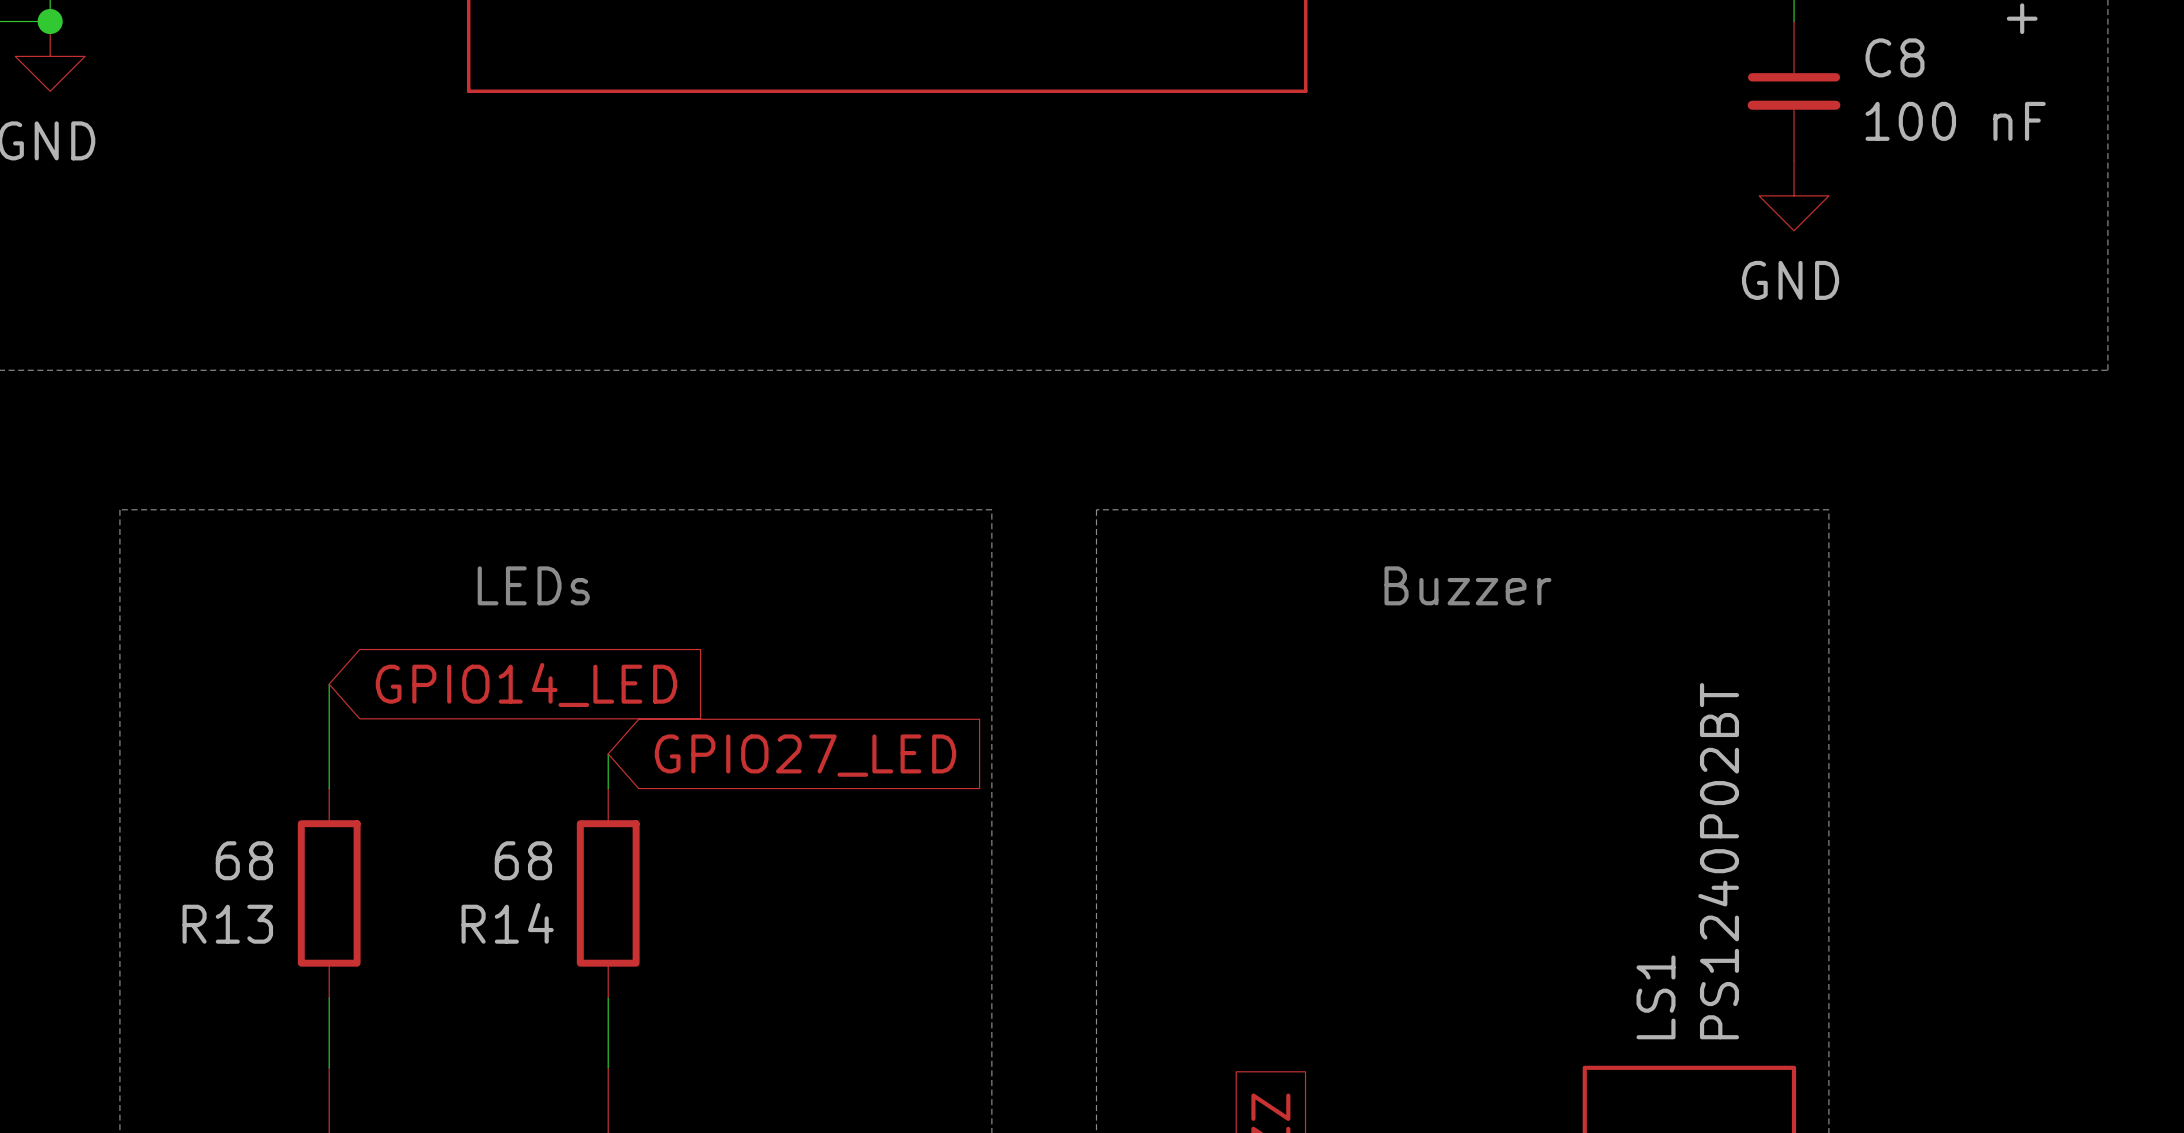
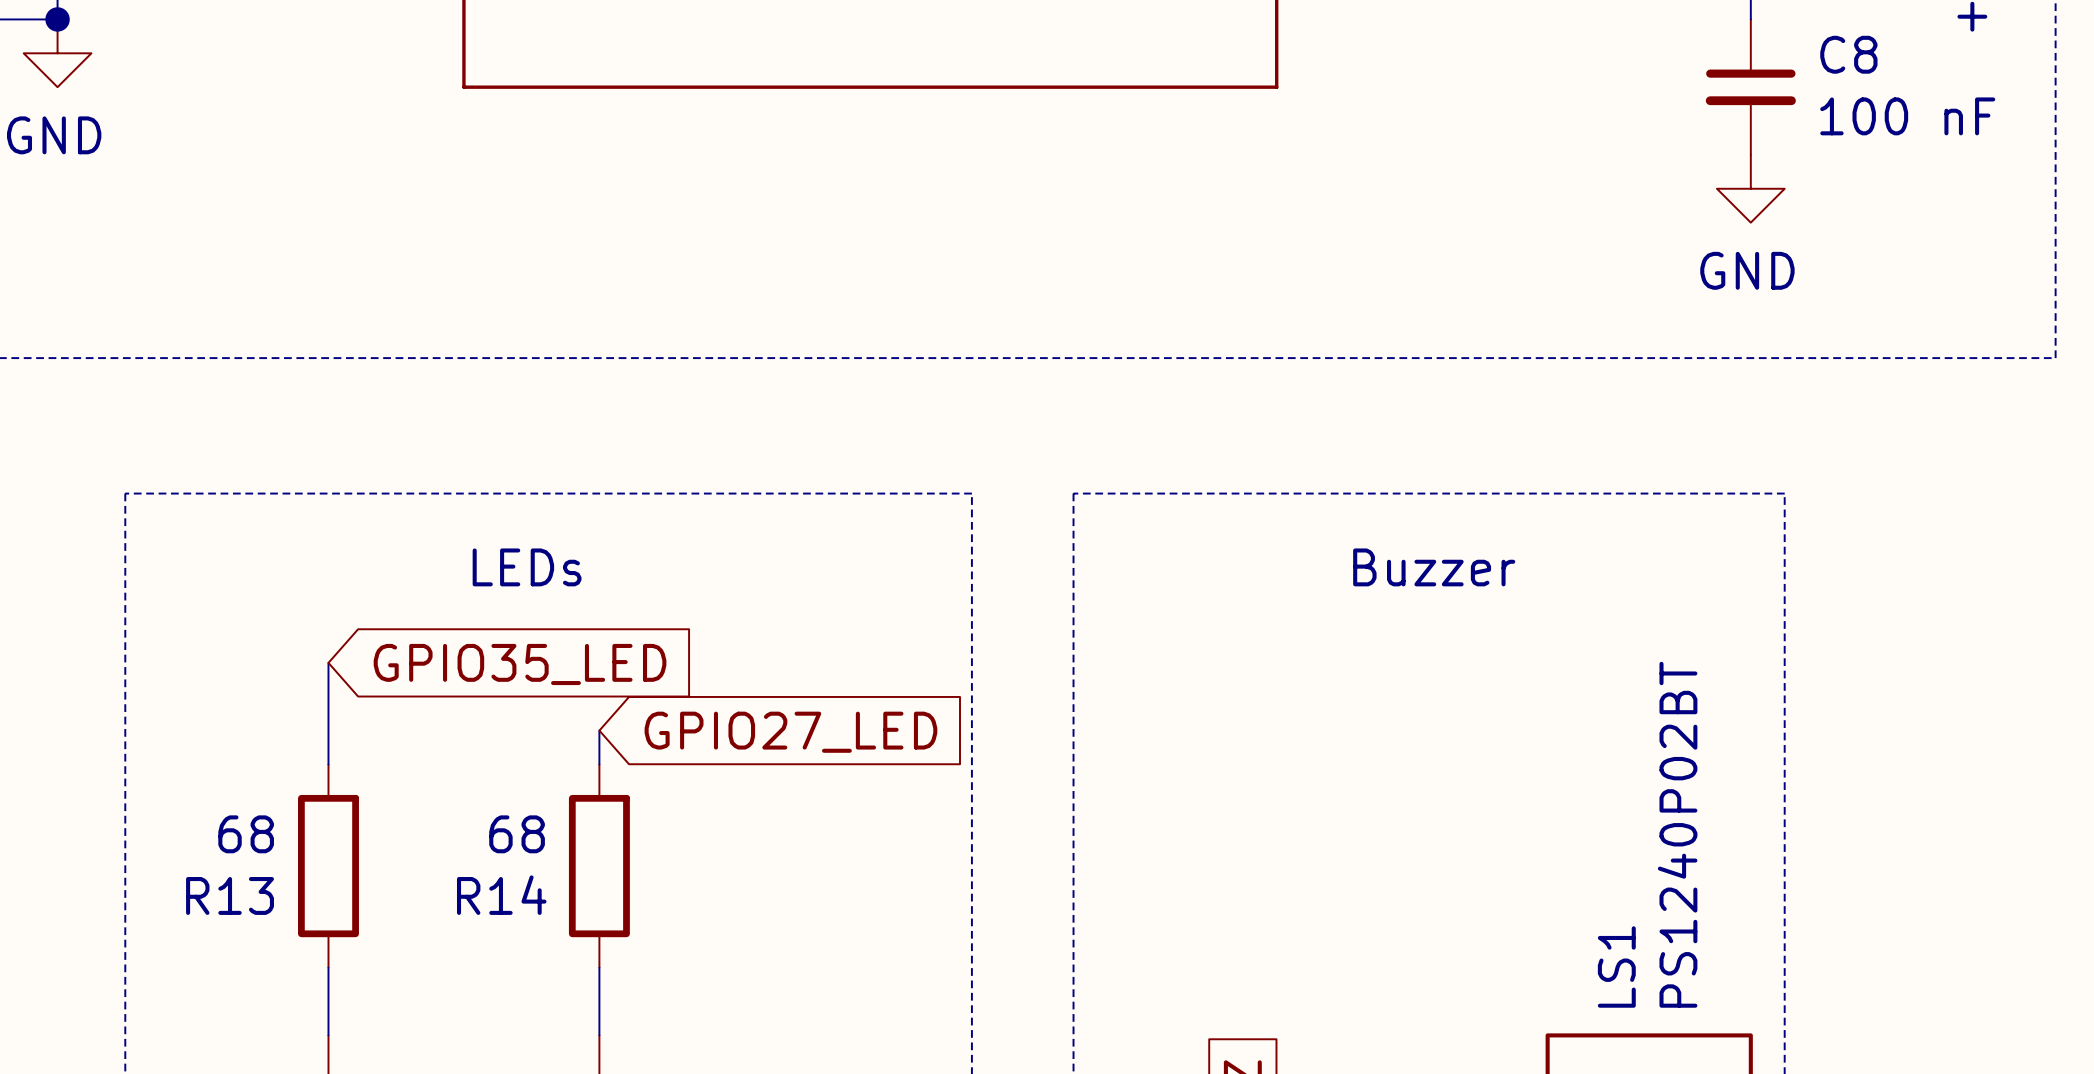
global label: GPIO14_LED (526, 685) -> GPIO35_LED (520, 664)

